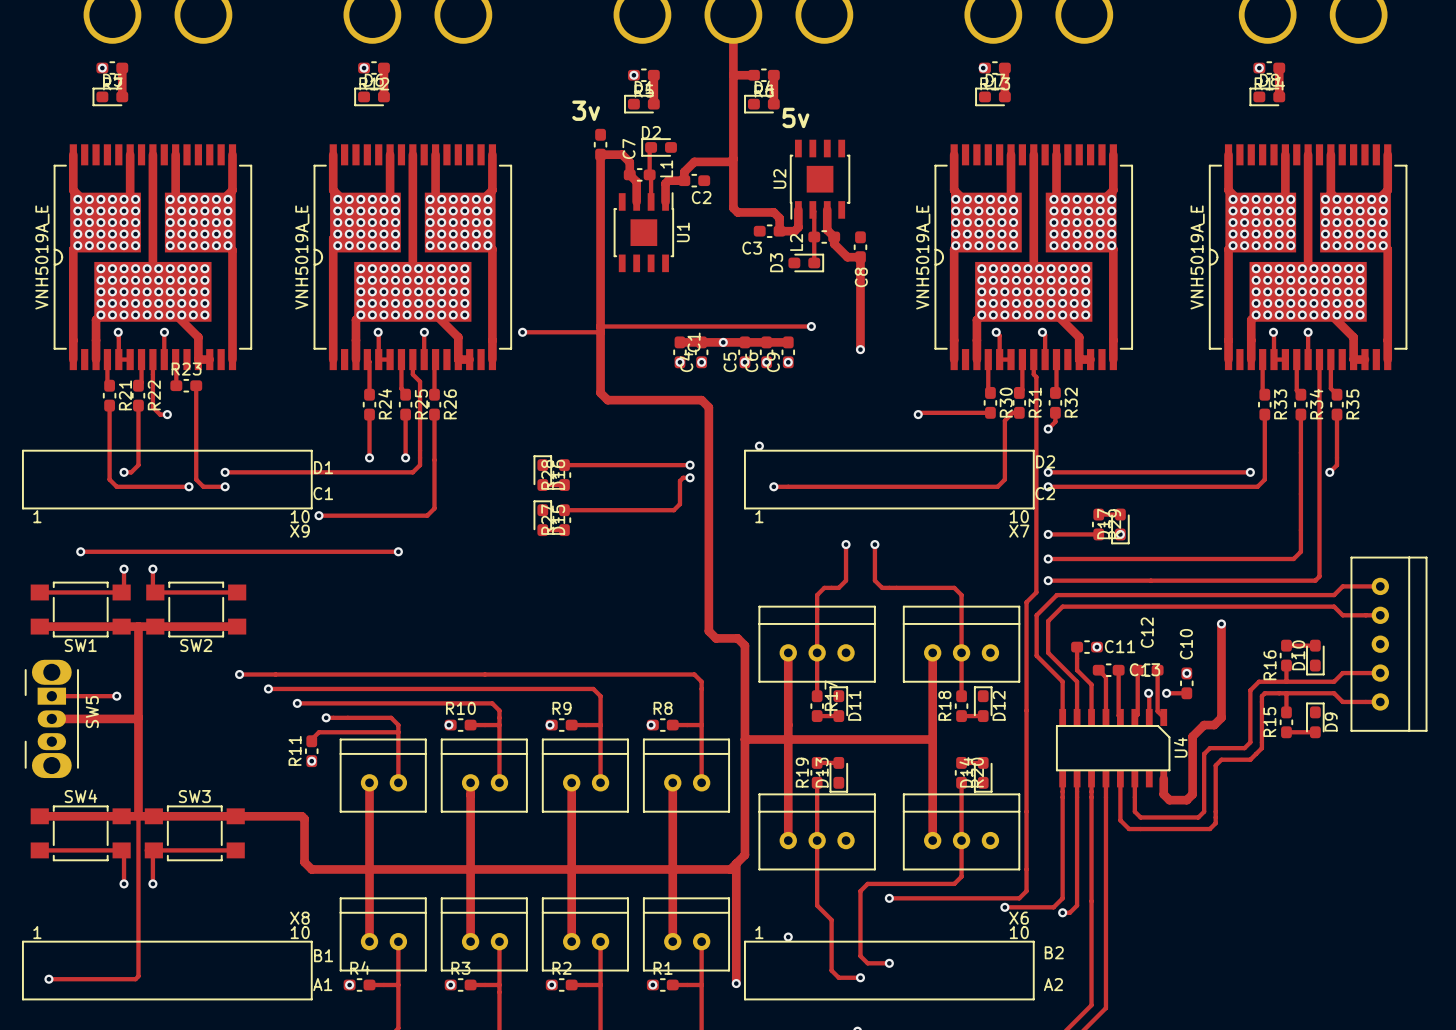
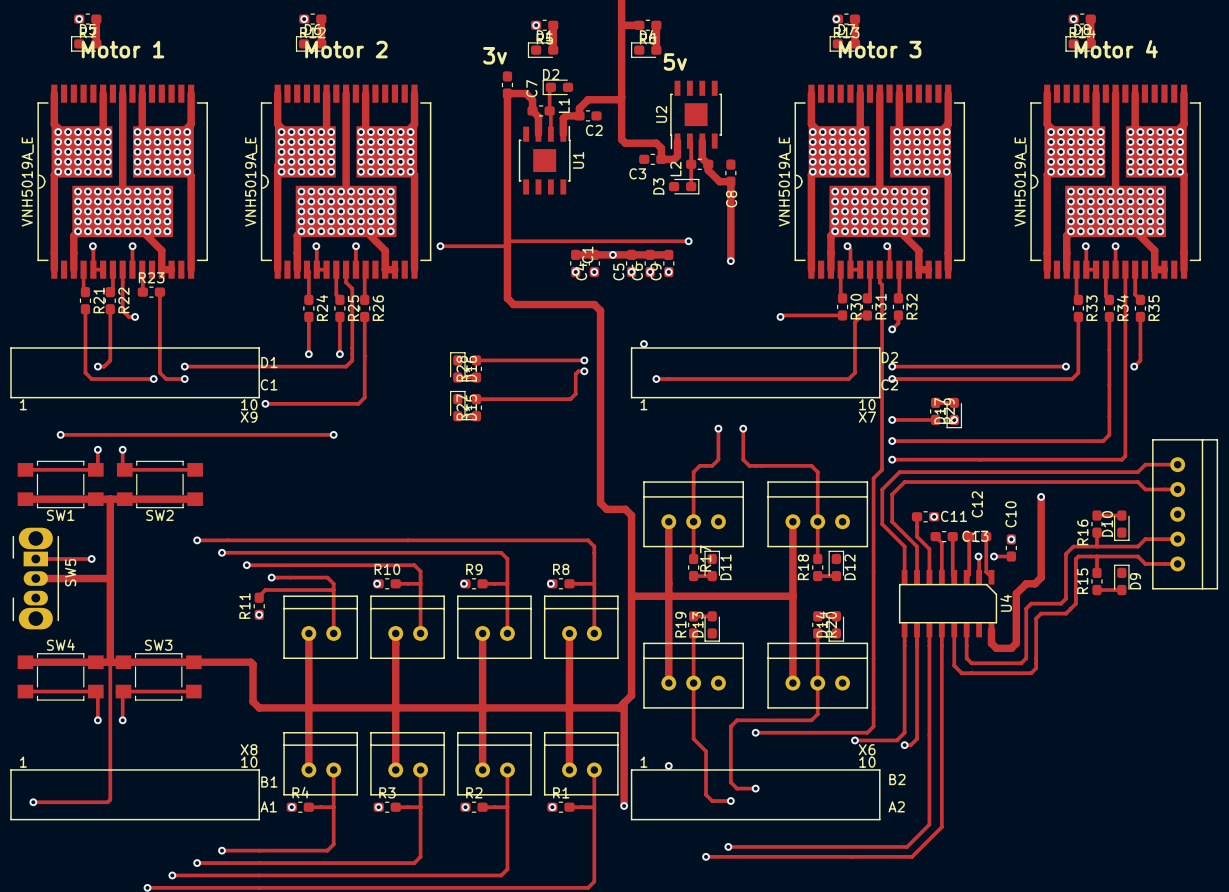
text: none -> Motor 1 (123, 49)
text: none -> Motor 2 (346, 49)
text: none -> Motor 3 (880, 49)
text: none -> Motor 4 (1116, 49)

